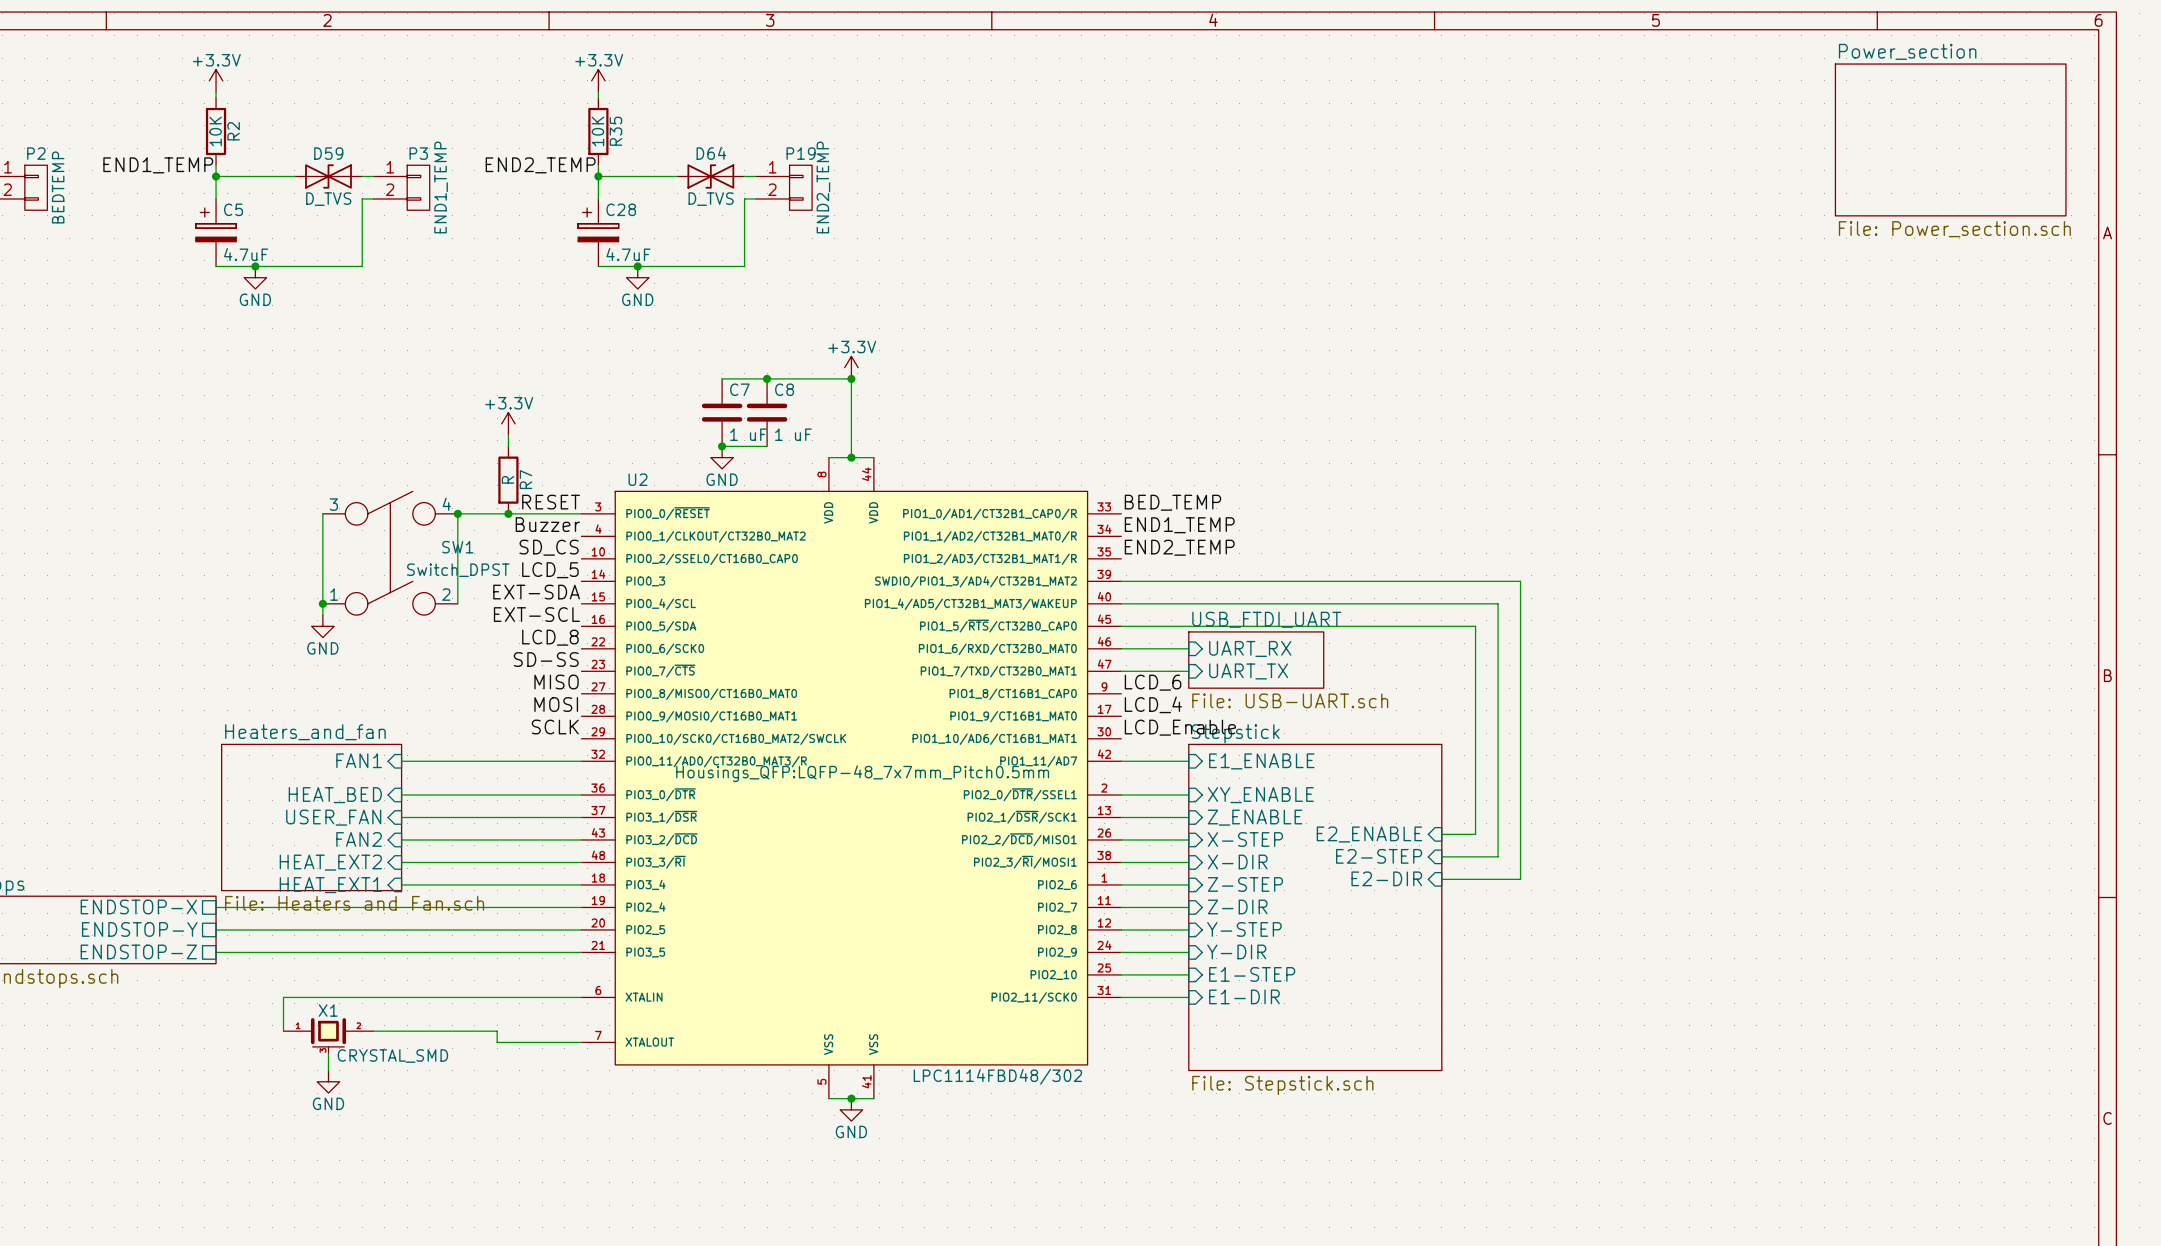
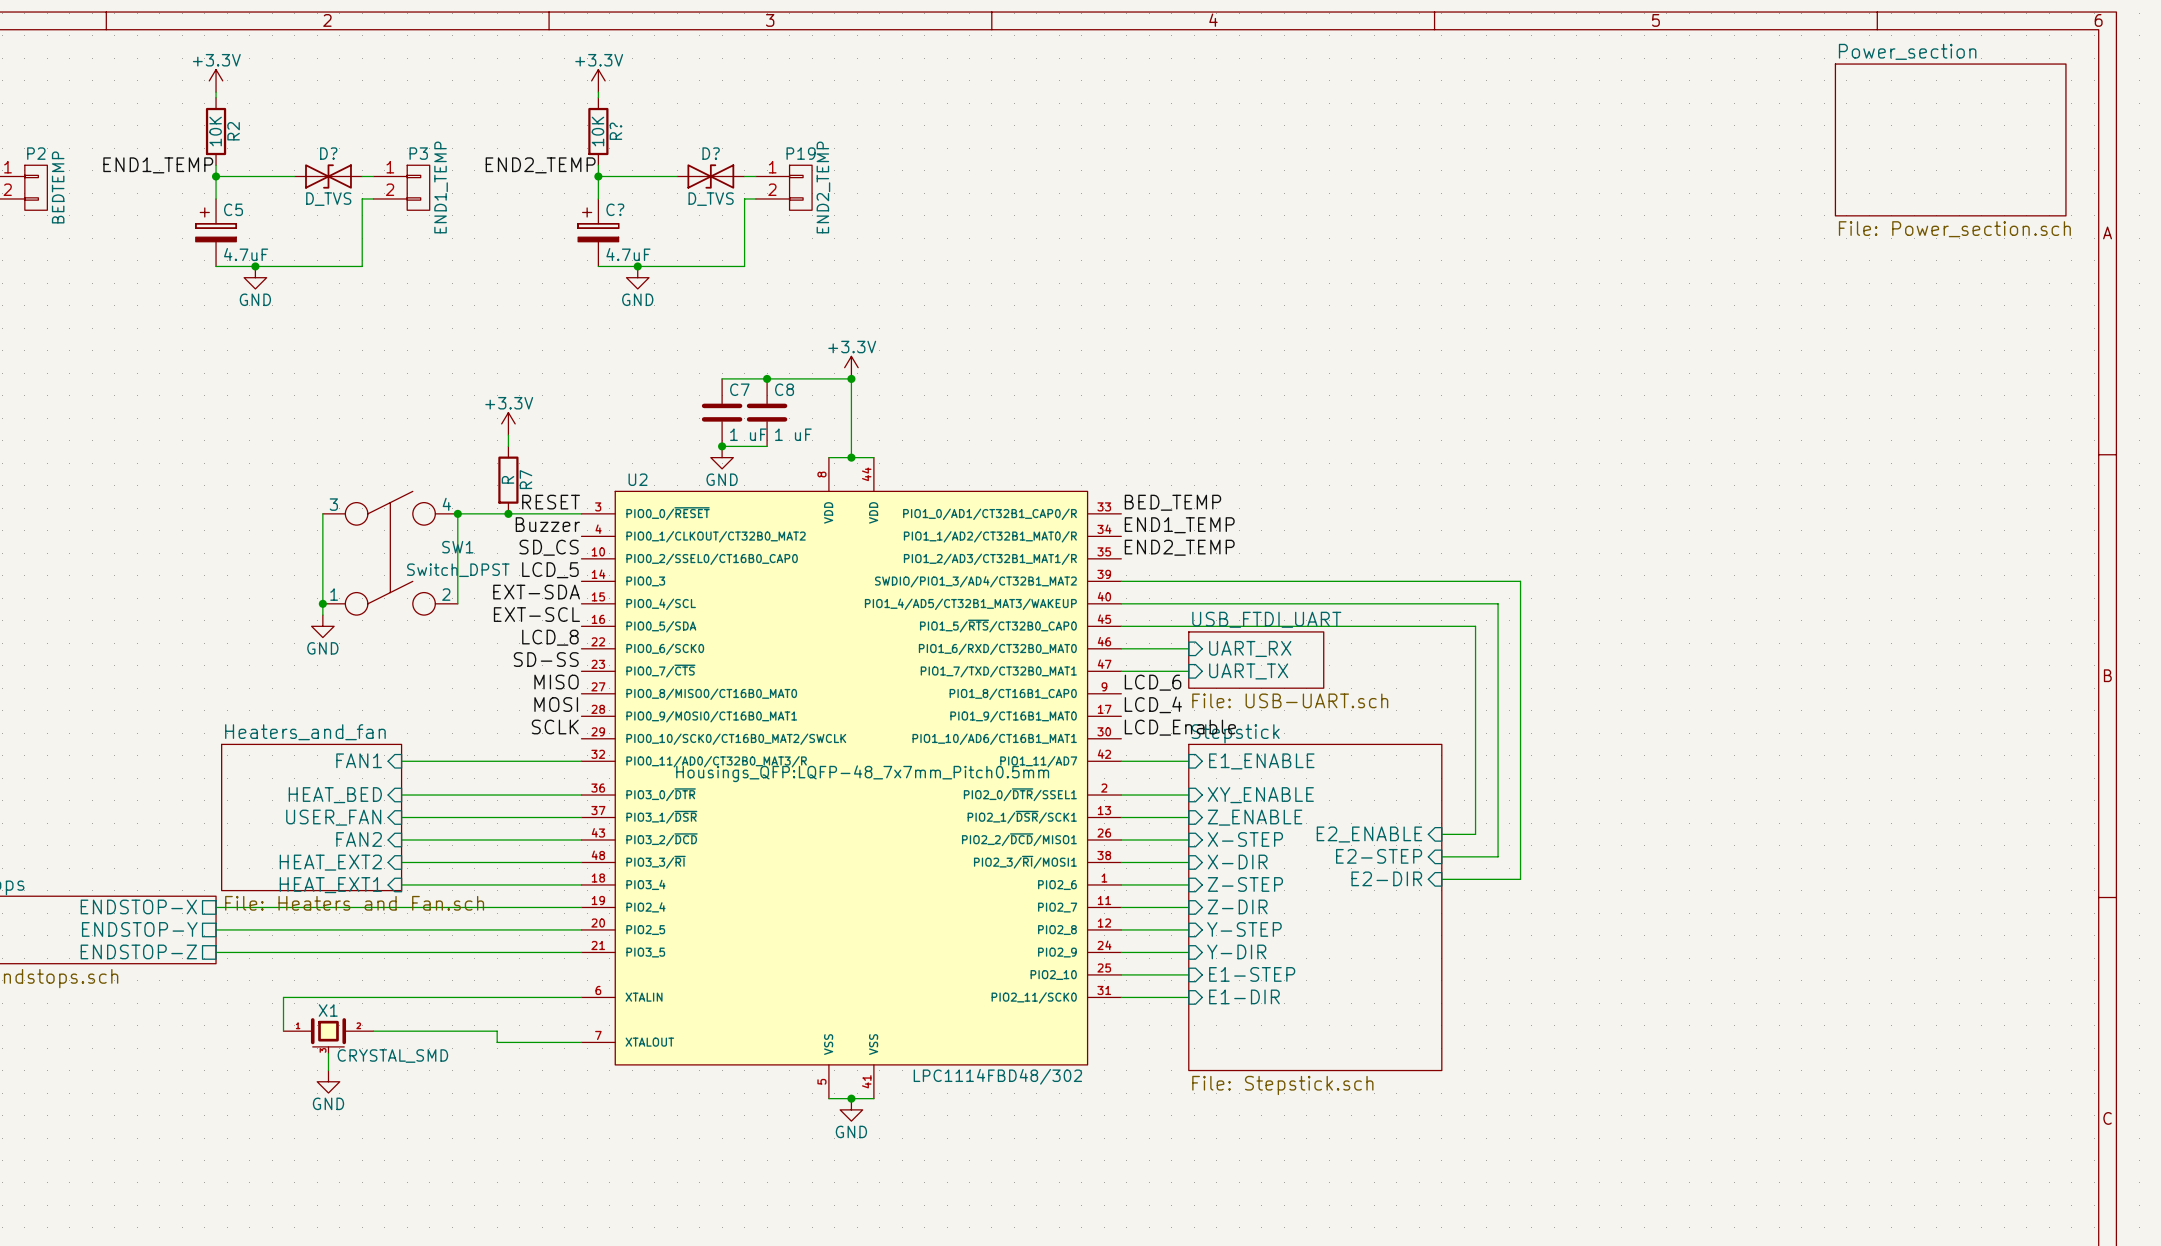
R35 name: R35 (615, 131) -> R? (615, 131)
D59 name: D59 (328, 153) -> D? (328, 153)
D64 name: D64 (711, 153) -> D? (711, 153)
C28 name: C28 (621, 209) -> C? (615, 209)

